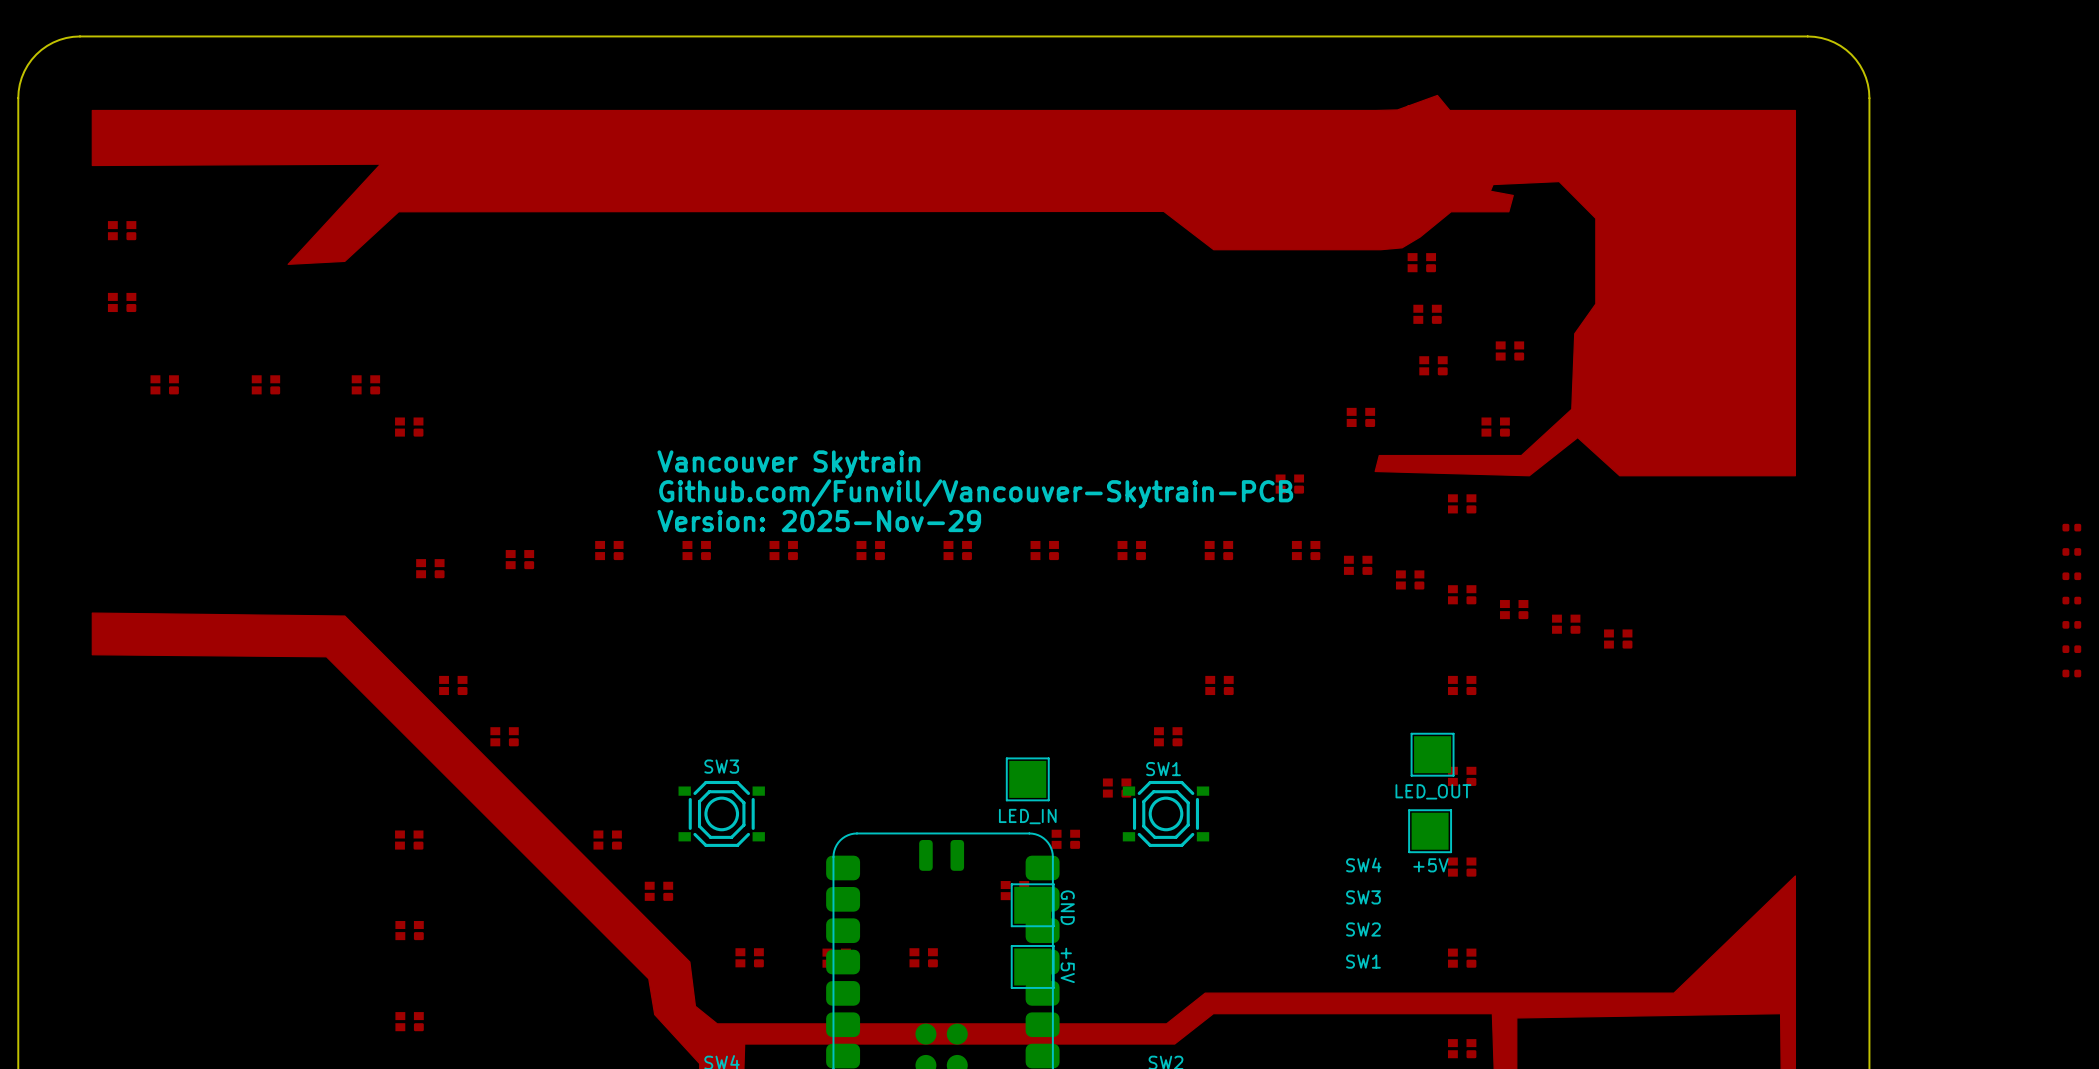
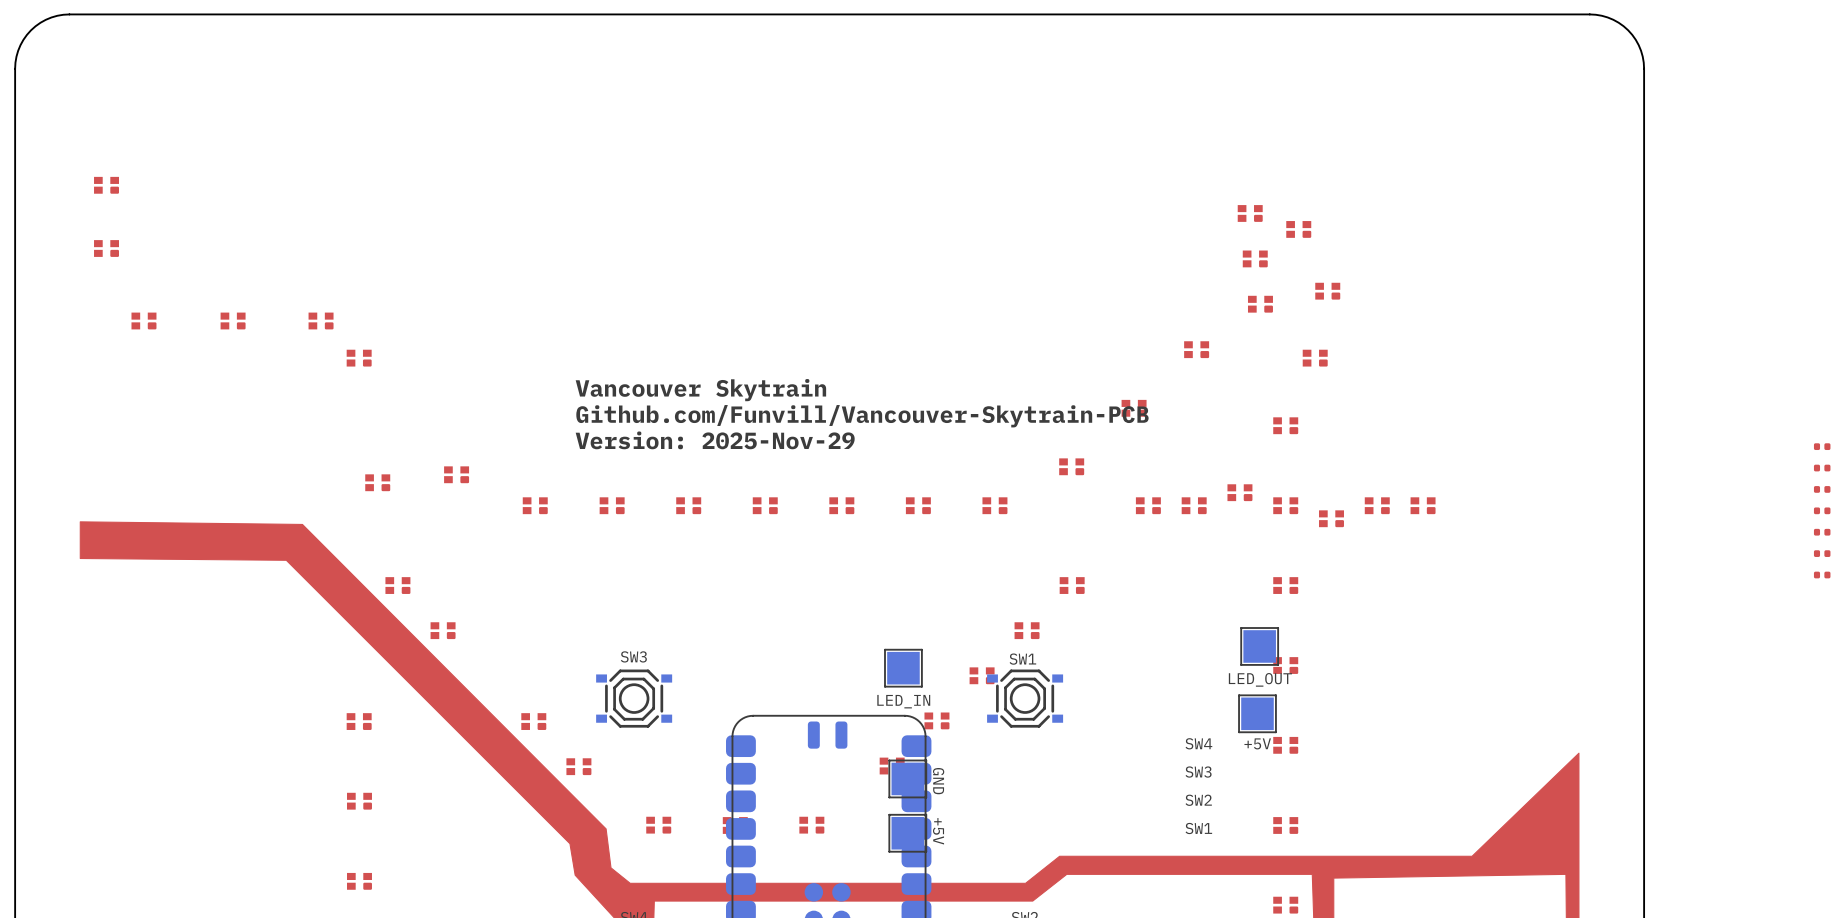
drawing: [91, 94, 1797, 477] -> none
part: none -> (1298, 229)
part position: (609, 550) -> (535, 505)
part position: (696, 550) -> (612, 505)
part position: (783, 550) -> (688, 505)
part position: (870, 550) -> (765, 505)
part position: (957, 550) -> (841, 505)
part position: (1044, 550) -> (918, 505)
part position: (1131, 550) -> (994, 505)
part: (1306, 550) -> none
part position: (1358, 565) -> (1194, 505)
part: none -> (1148, 505)
part: none -> (1423, 505)
part position: (1566, 624) -> (1377, 505)
part: (1618, 639) -> none

